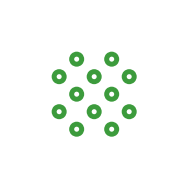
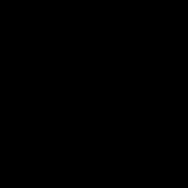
part: (94, 94) -> none

